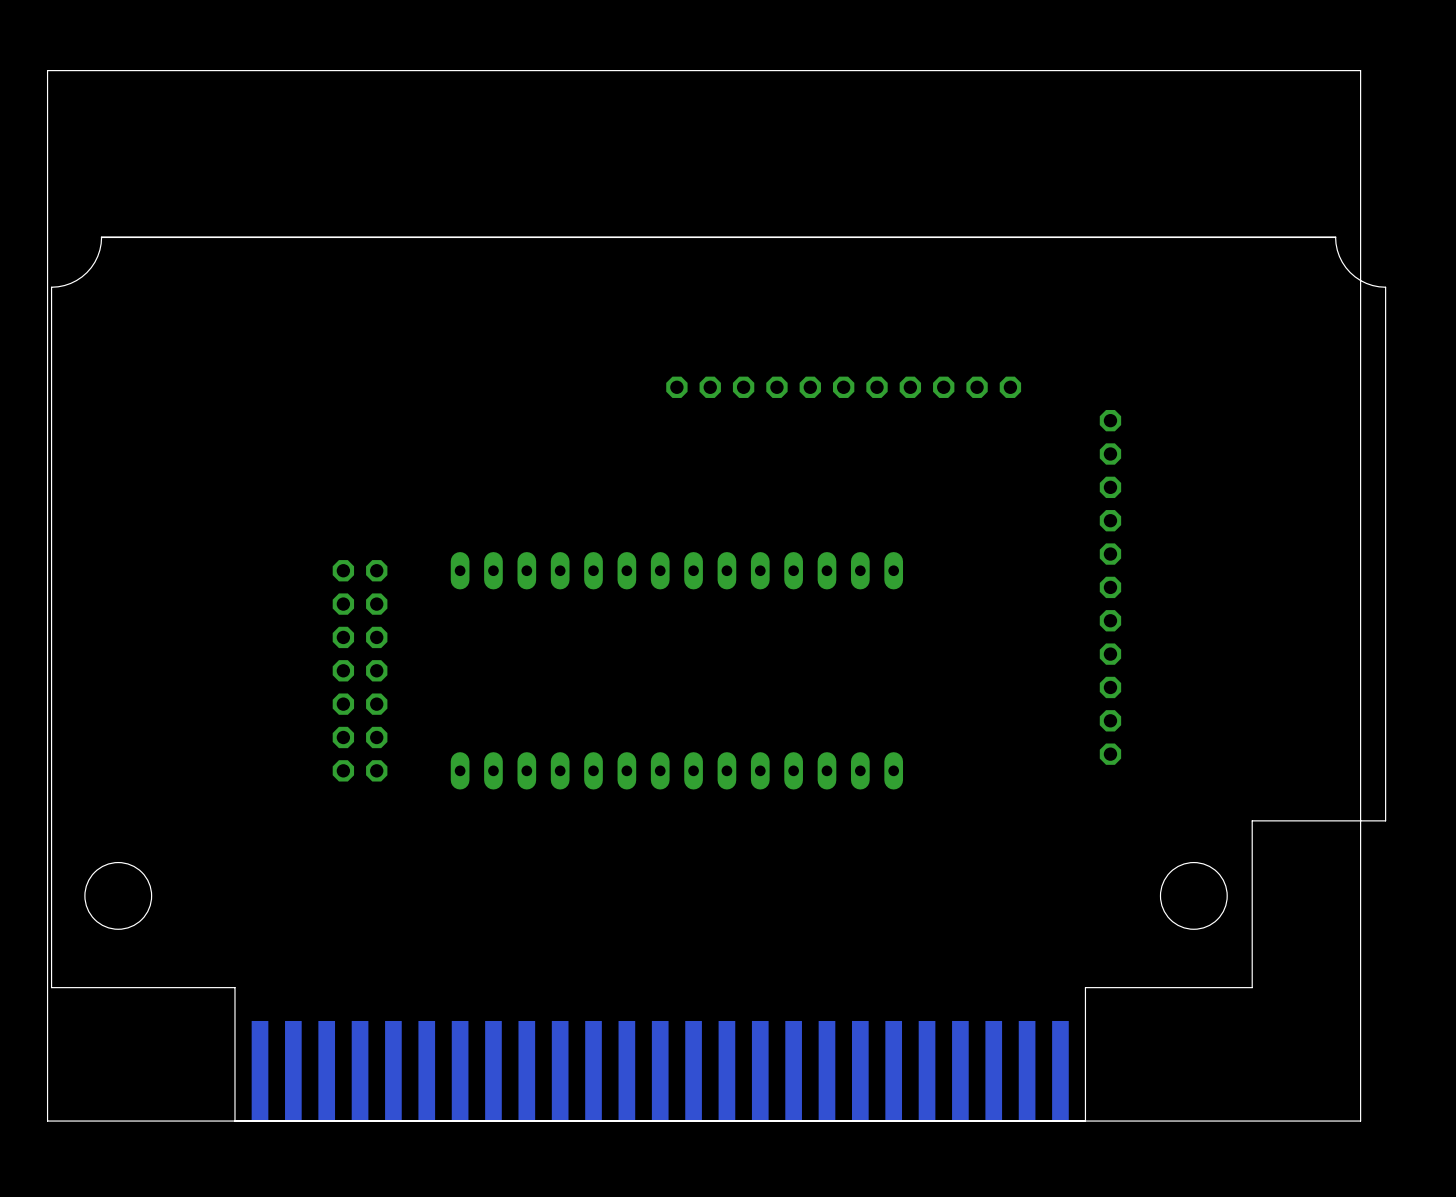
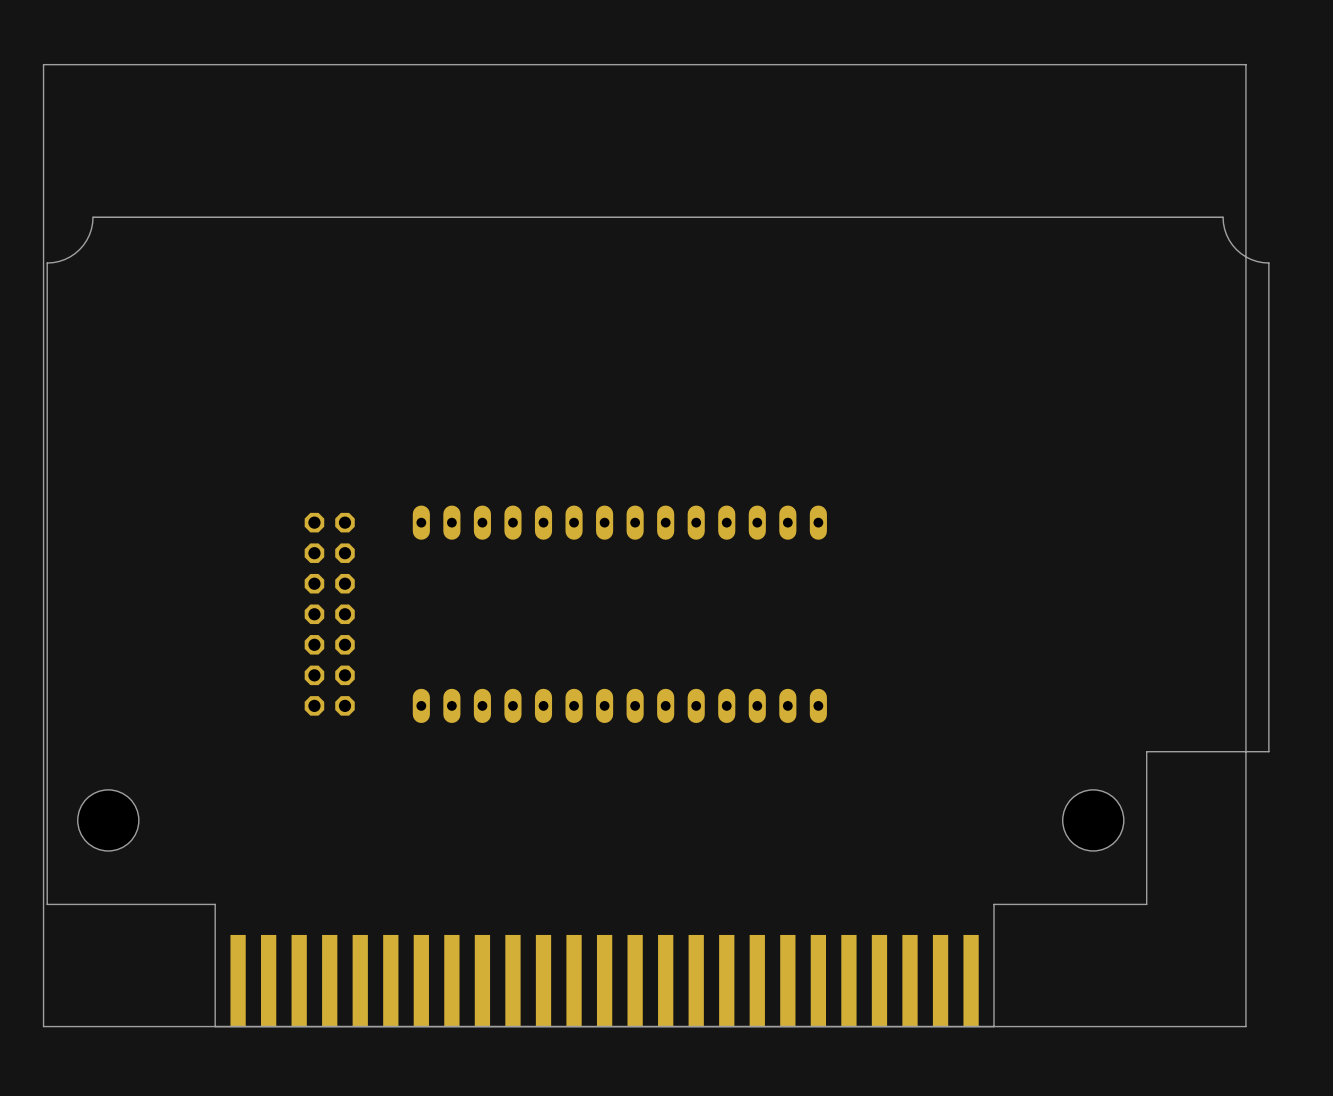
part: (676, 387) -> none
part: (710, 387) -> none
part: (743, 387) -> none
part: (826, 387) -> none
part: (960, 387) -> none
part: (1110, 420) -> none
part: (1110, 454) -> none
part: (1110, 487) -> none
part: (1110, 570) -> none
part: (1110, 704) -> none

